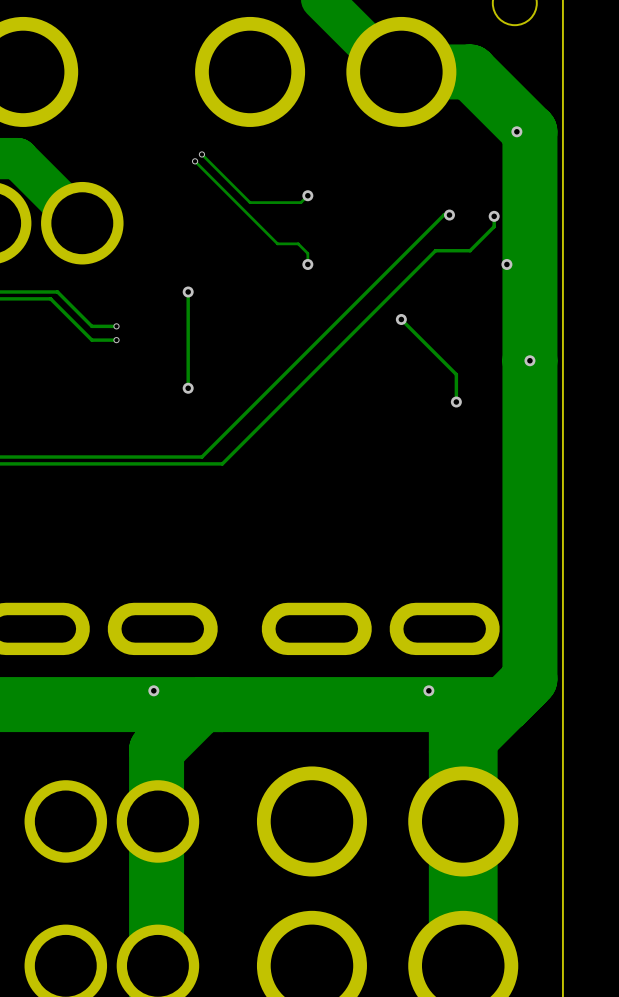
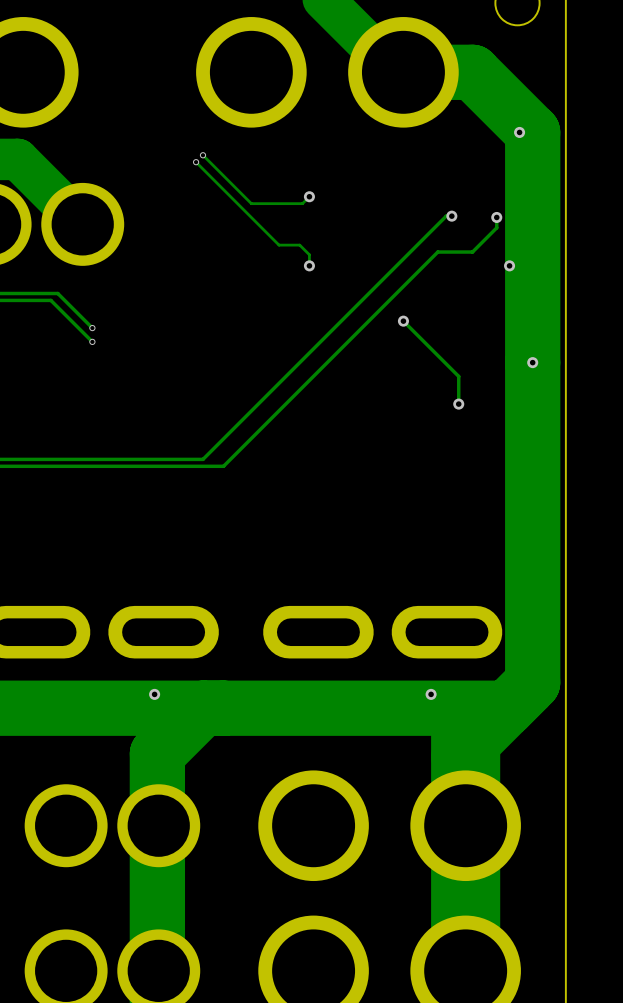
track: (188, 291) (188, 388) -> none
via: (188, 291) -> none
via: none -> (92, 328)
track: (116, 326) (91, 326) -> none
via: (116, 326) -> none
via: none -> (92, 341)
track: (116, 340) (91, 340) -> none
via: (116, 340) -> none
via: (188, 388) -> none

